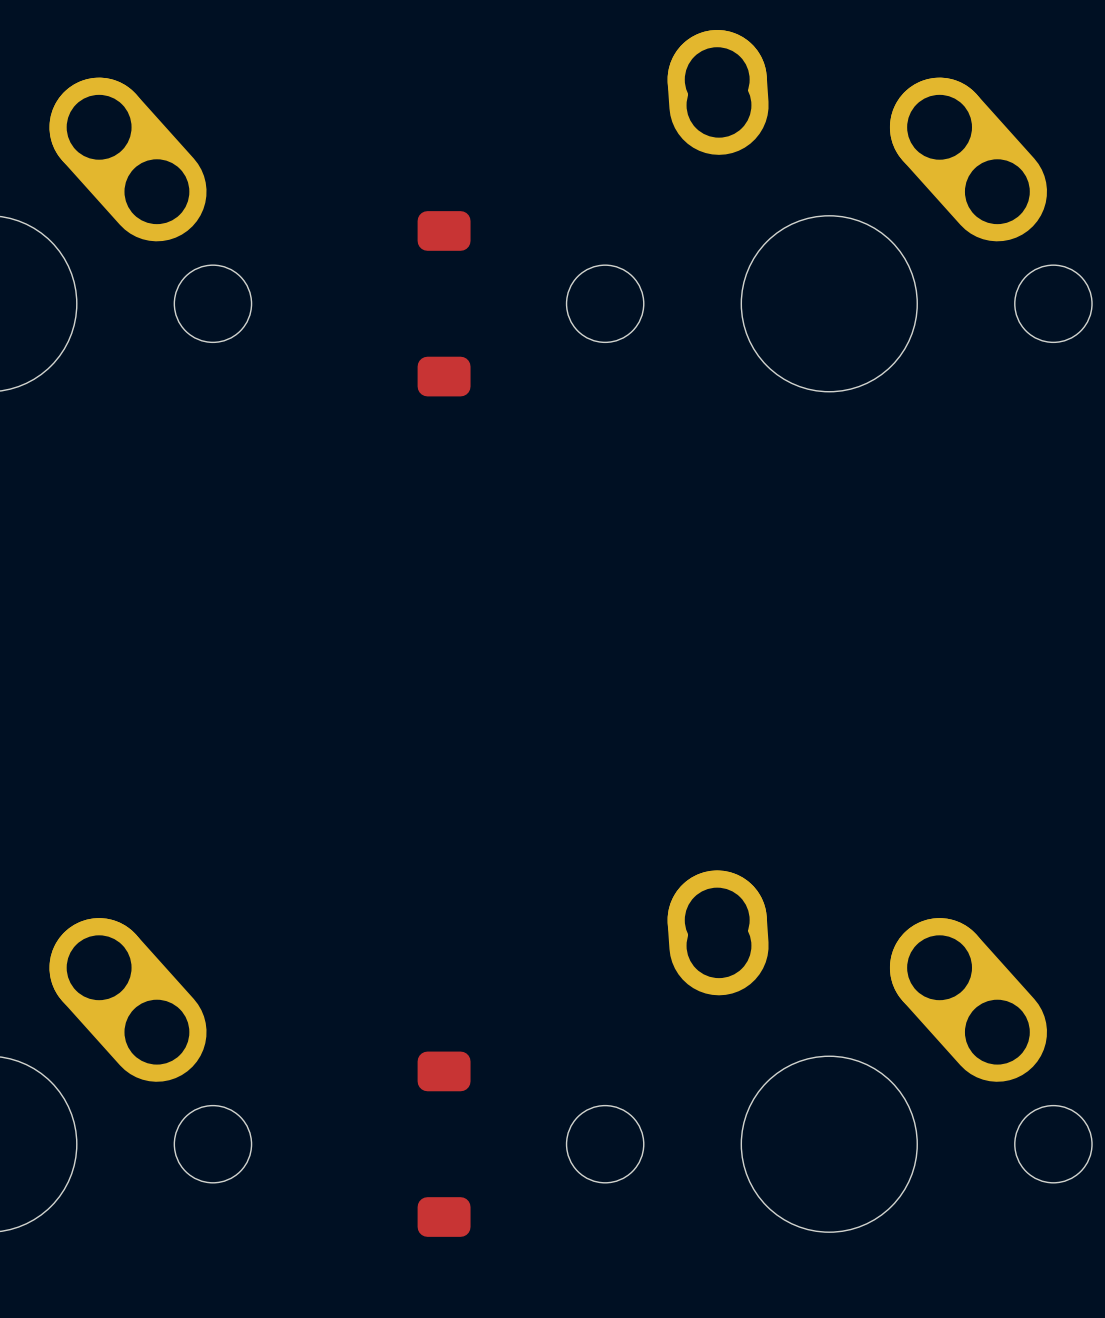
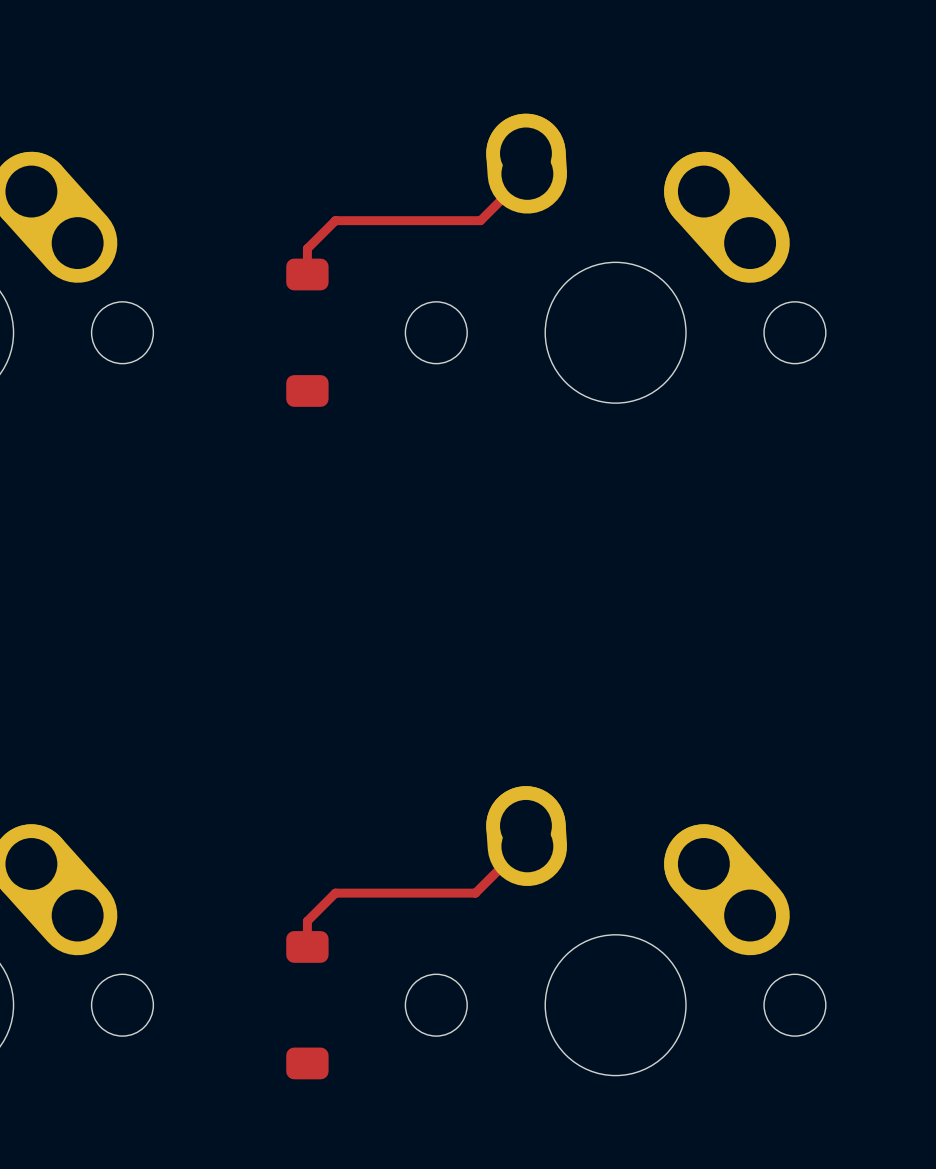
top track: none -> (527, 173) (480, 220) (335, 220) (307, 248) (307, 274)
top track: none -> (527, 846) (522, 846) (475, 893) (335, 893) (307, 921) (307, 946)

